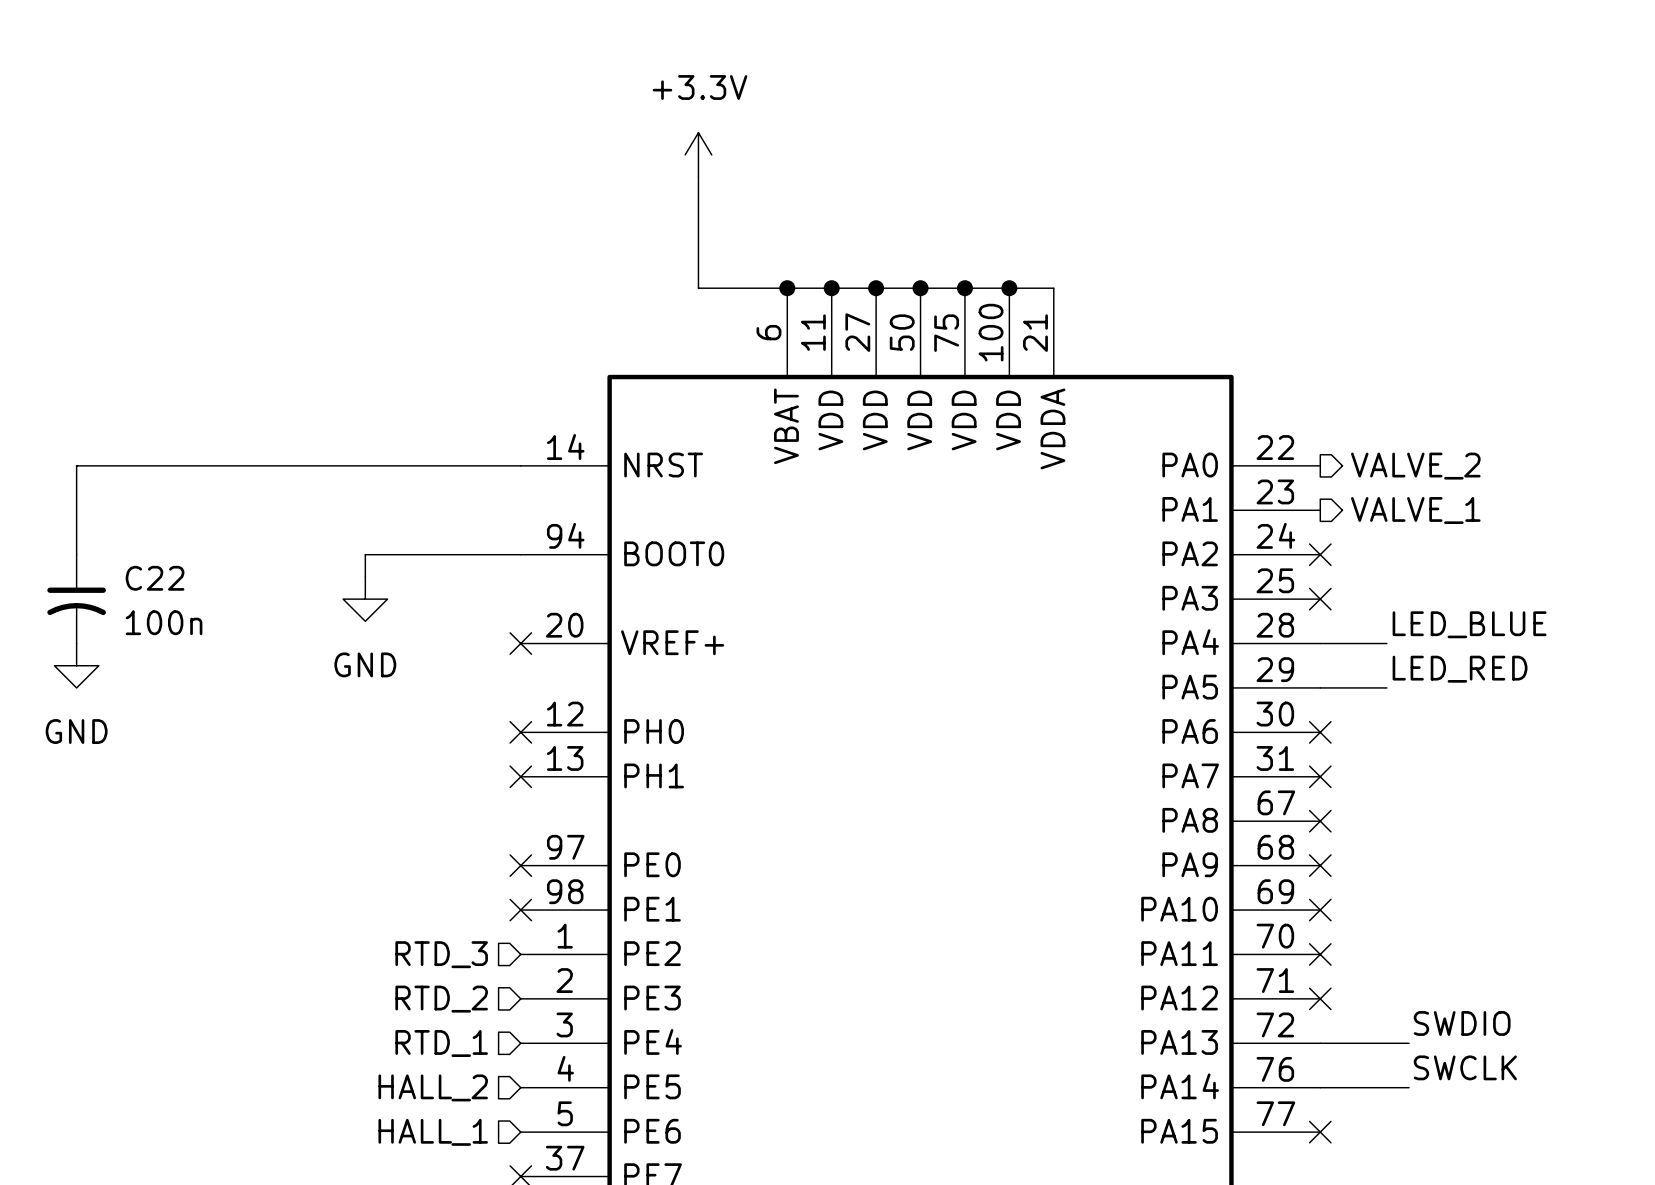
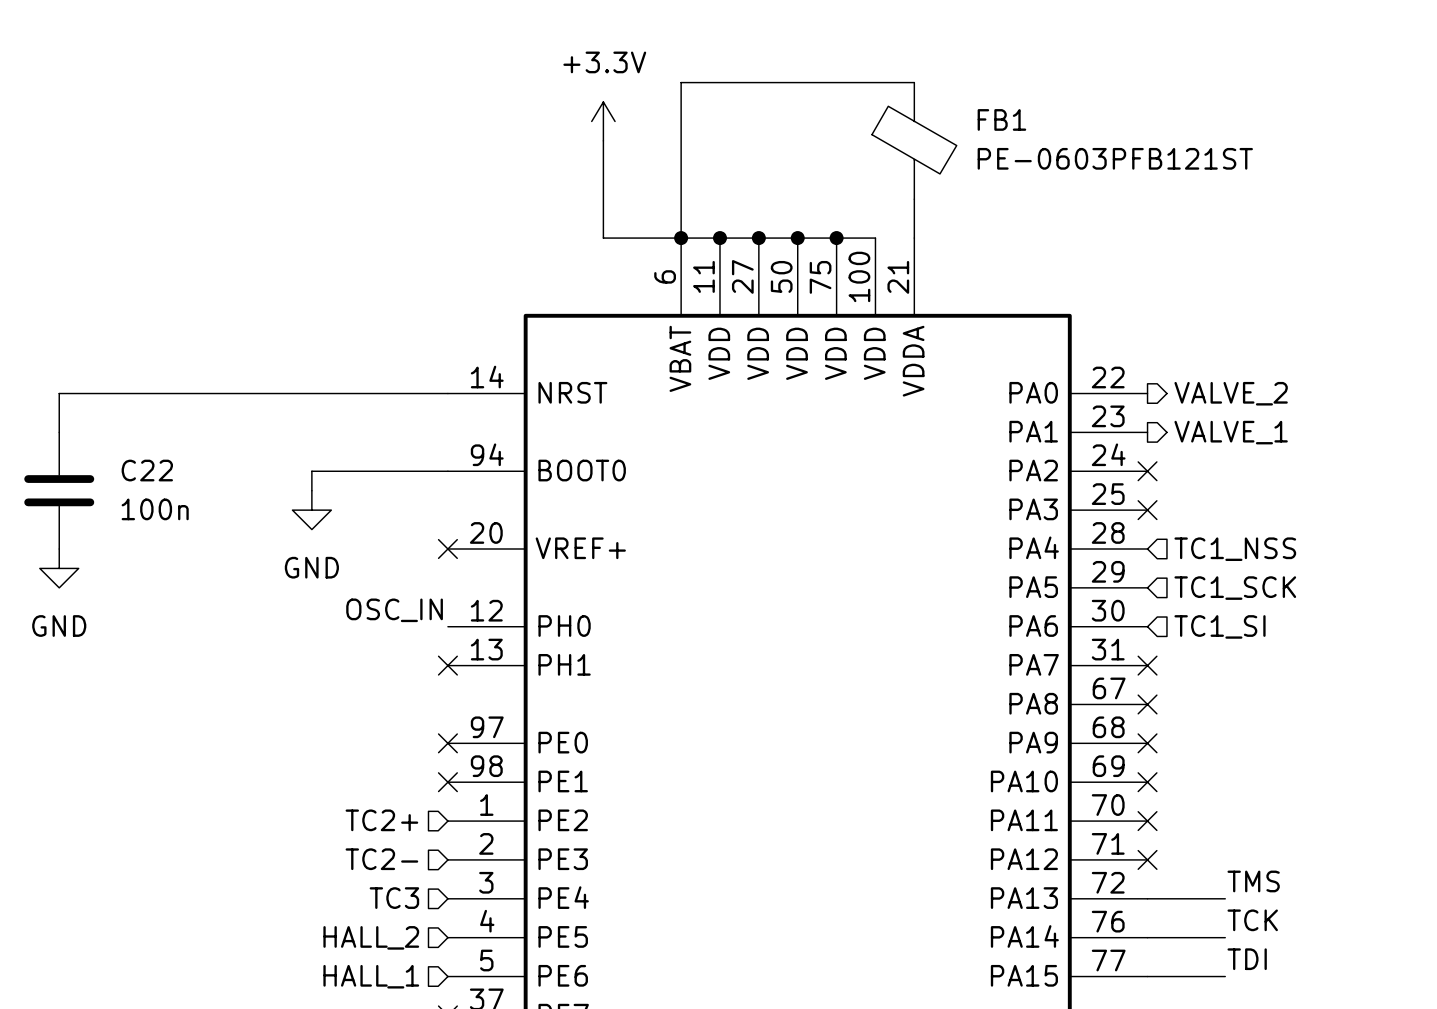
wire: none -> (914, 82) (681, 82) (681, 238)
FB1: none -> PE-0603PFB121ST (914, 140)
wire: (1009, 288) (1053, 288) -> (914, 199) (914, 238)
junction: (1009, 288) -> none
C22 symbol: [47, 554, 106, 644] -> [24, 432, 95, 550]
label: LED_BLUE (1469, 624) -> none
wire: (1320, 643) (1386, 643) -> none
hierarchical label: none -> TC1_NSS (1235, 549)
label: LED_RED (1460, 669) -> none
wire: (1320, 687) (1386, 687) -> none
hierarchical label: none -> TC1_SCK (1235, 588)
label: none -> OSC_IN (394, 610)
no-connect mark: (520, 732) -> none
no-connect mark: (1320, 732) -> none
hierarchical label: none -> TC1_SI (1220, 626)
hierarchical label: RTD_3 (441, 954) -> TC2+ (381, 820)
hierarchical label: RTD_2 (441, 999) -> TC2- (381, 859)
label: SWDIO (1462, 1023) -> TMS (1253, 881)
hierarchical label: RTD_1 (441, 1043) -> TC3 (394, 898)
label: SWCLK (1465, 1067) -> TCK (1252, 920)
label: none -> TDI (1247, 959)
wire: none -> (1147, 976) (1225, 976)
no-connect mark: (1320, 1132) -> none

